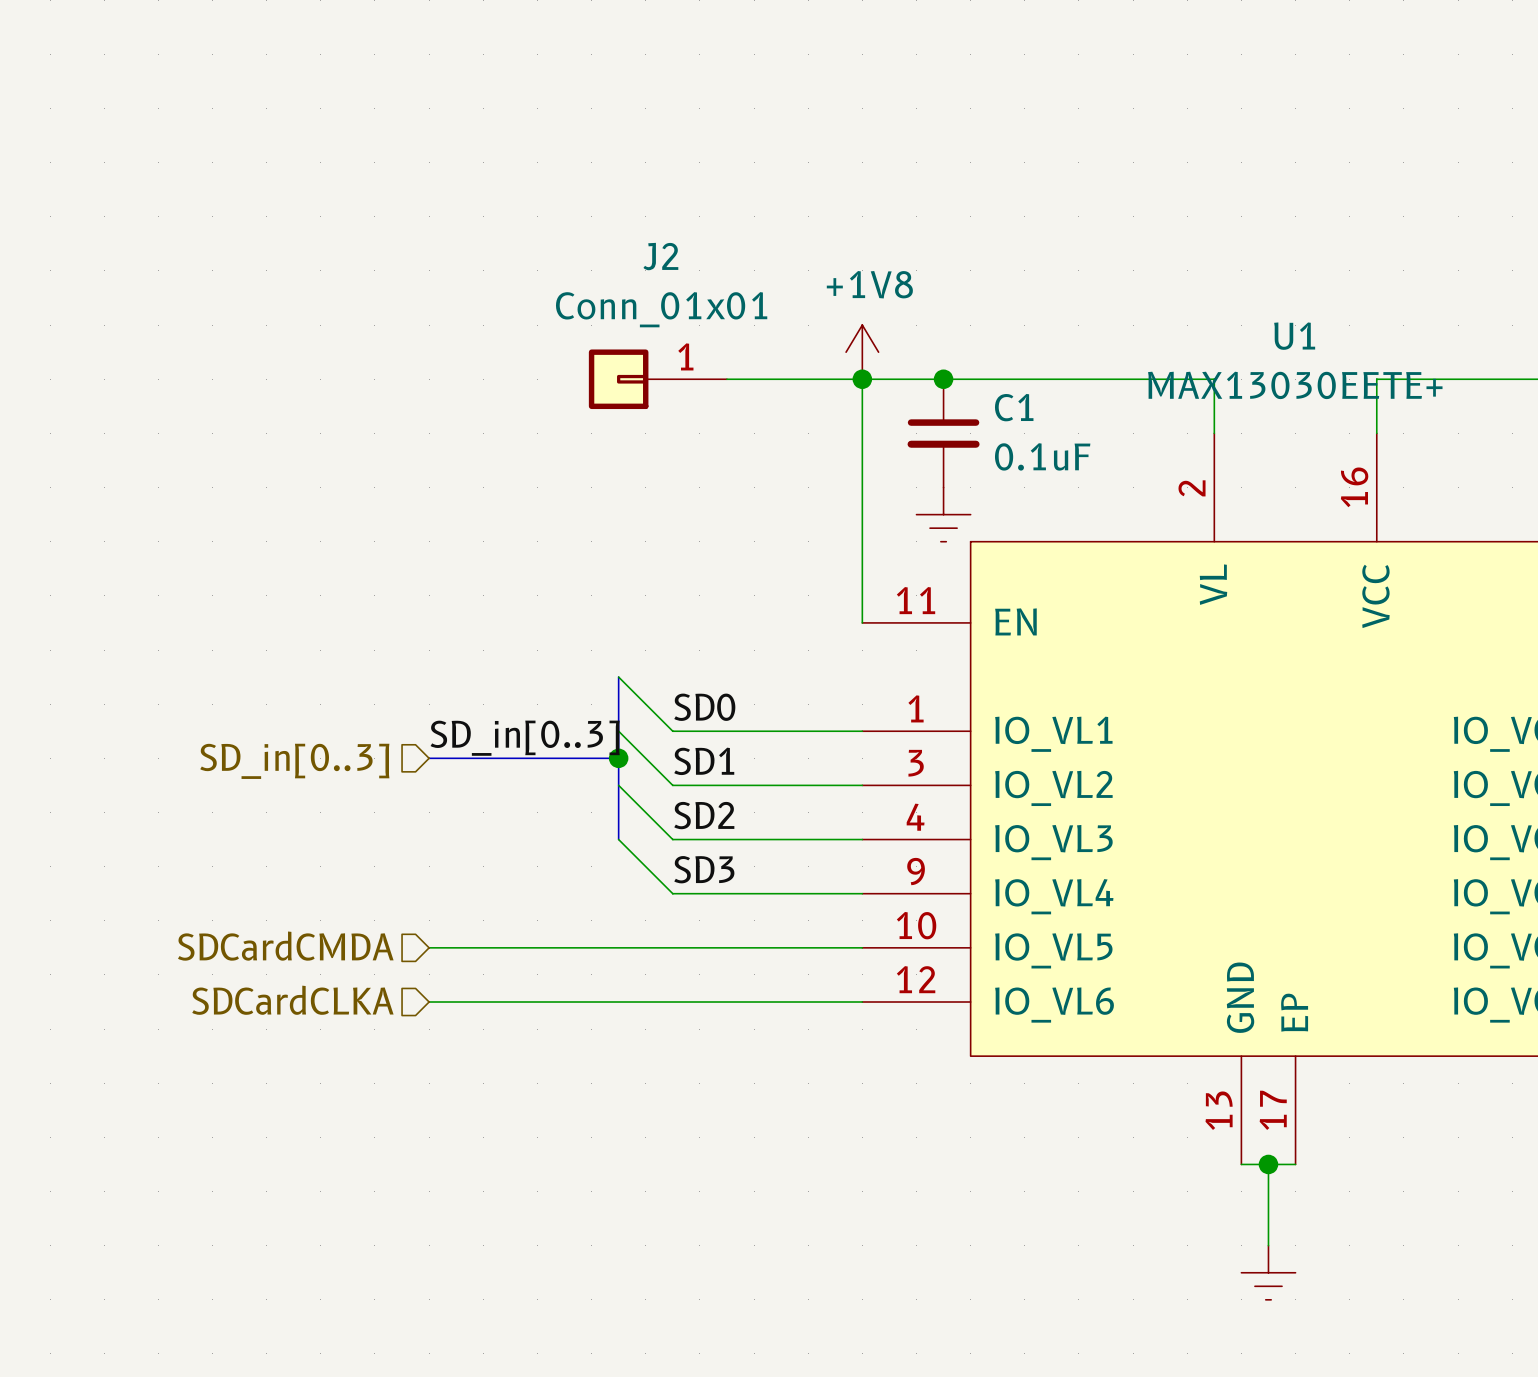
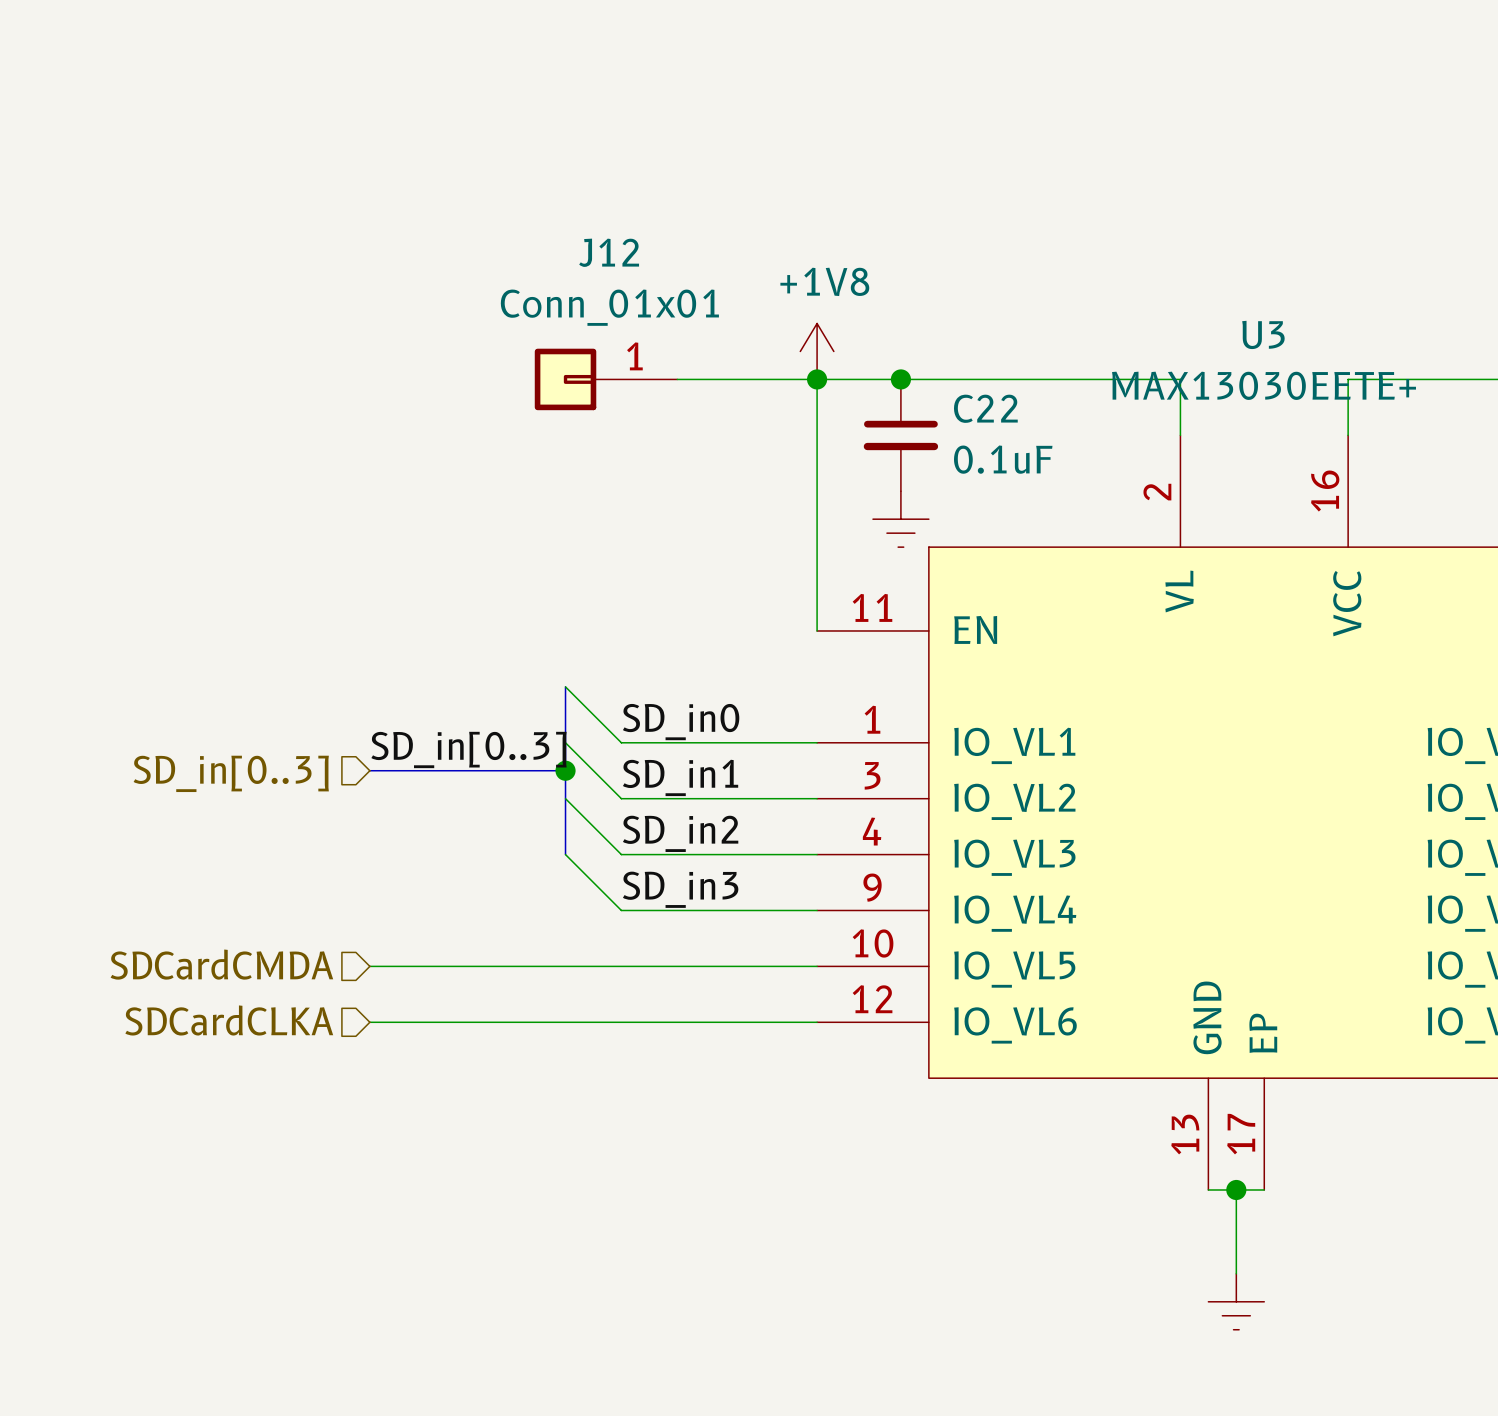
J2 name: J2 (660, 256) -> J12 (609, 252)
U1 name: U1 (1294, 336) -> U3 (1263, 334)
C1 name: C1 (1014, 407) -> C22 (985, 408)
label: SD0 (704, 707) -> SD_in0 (681, 722)
label: SD1 (704, 761) -> SD_in1 (680, 777)
label: SD2 (704, 815) -> SD_in2 (680, 833)
label: SD3 (704, 869) -> SD_in3 (680, 889)

